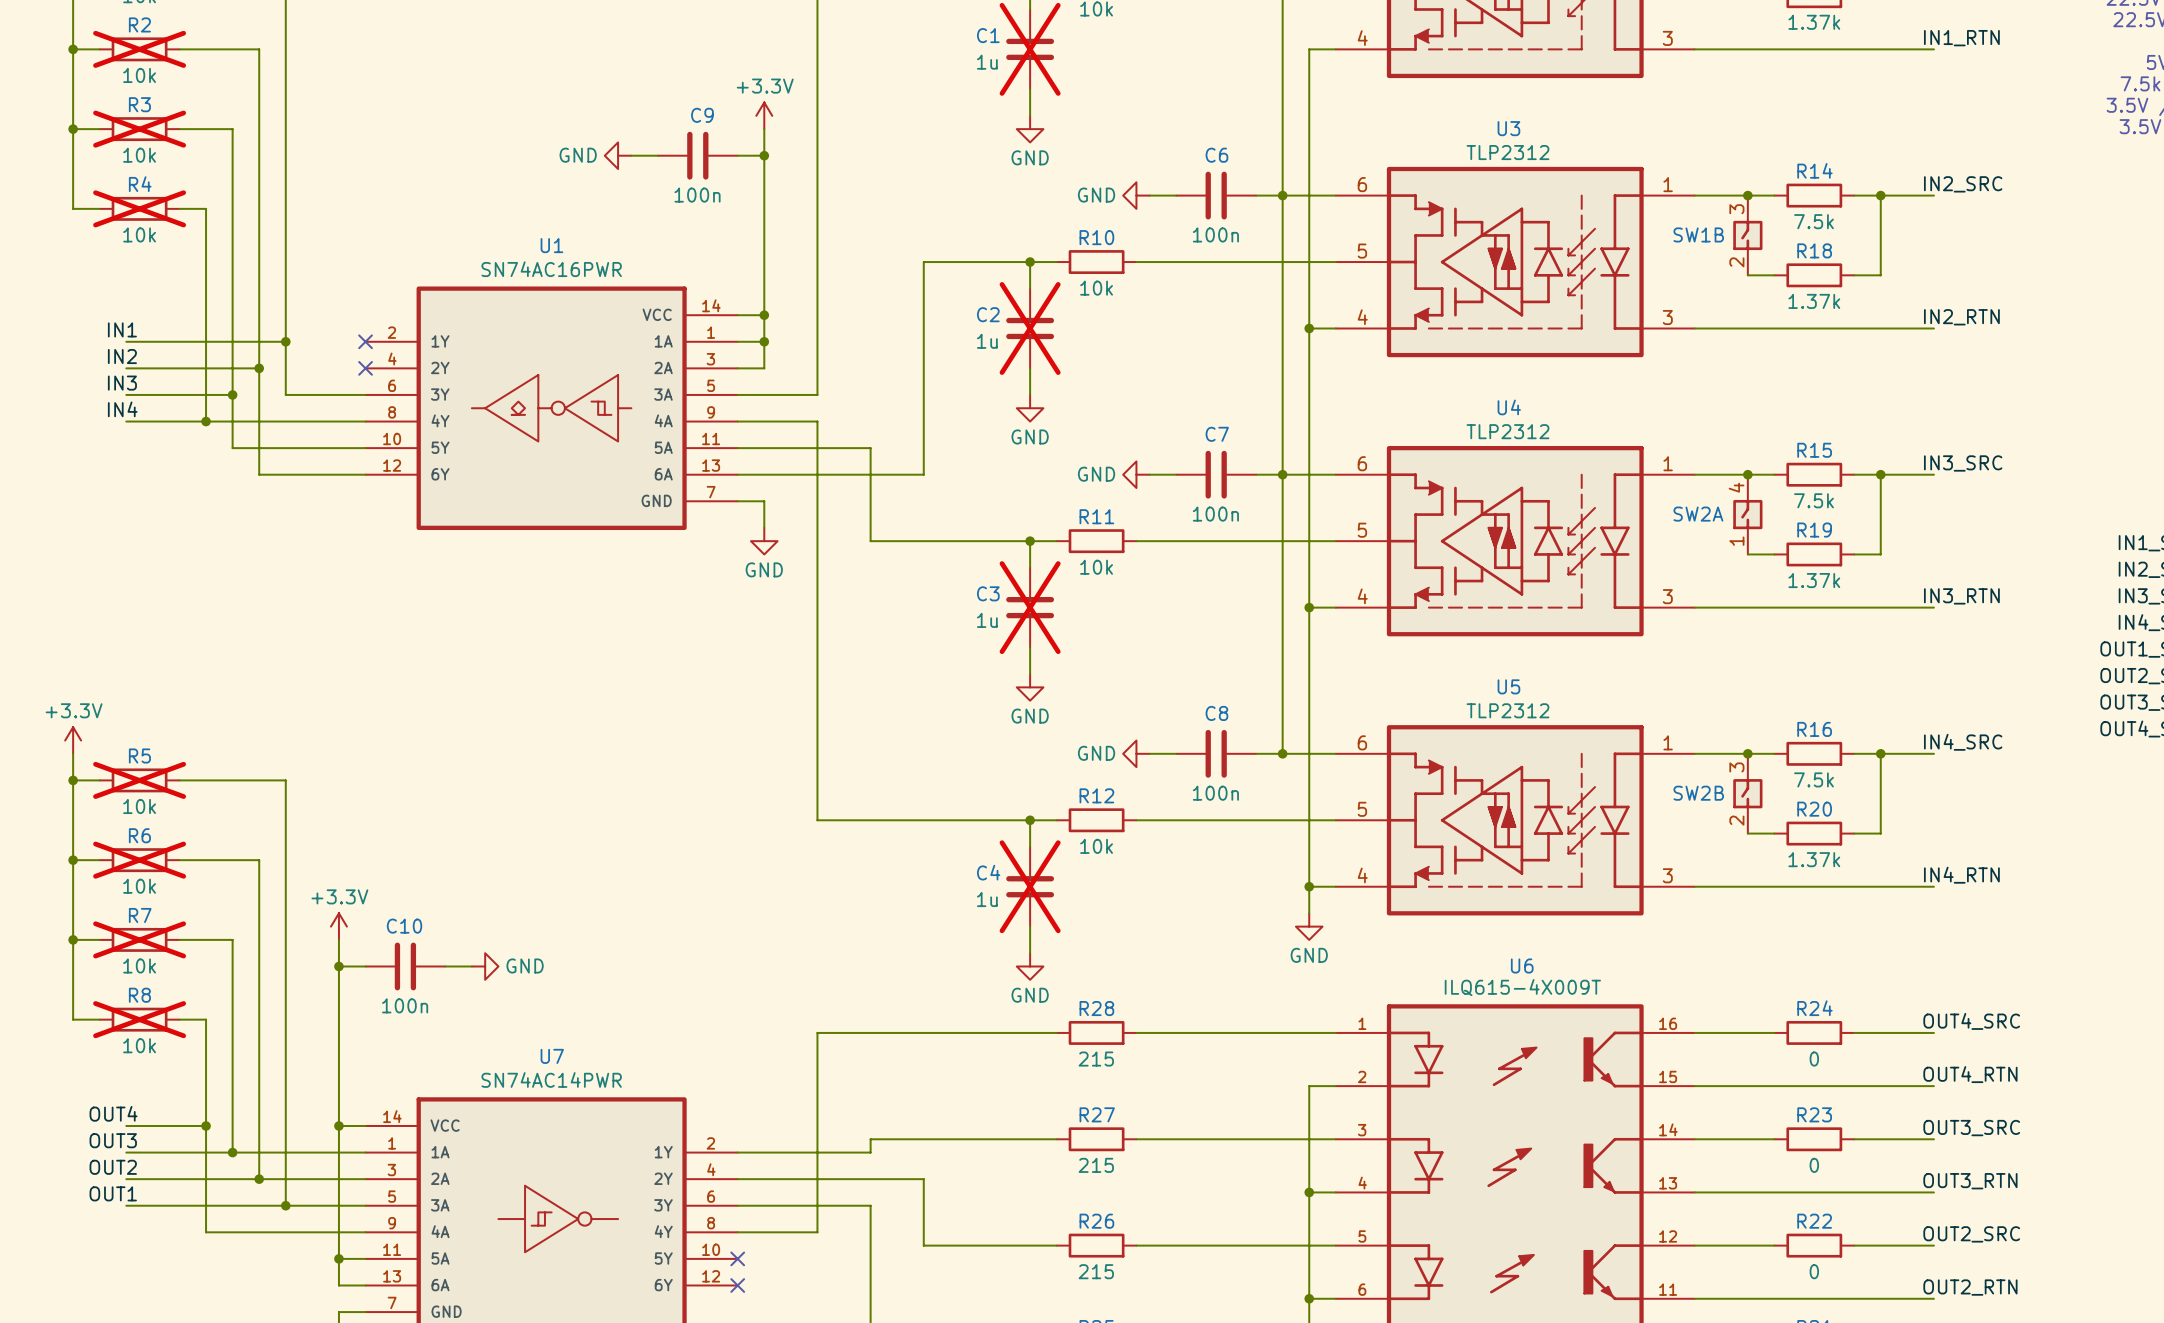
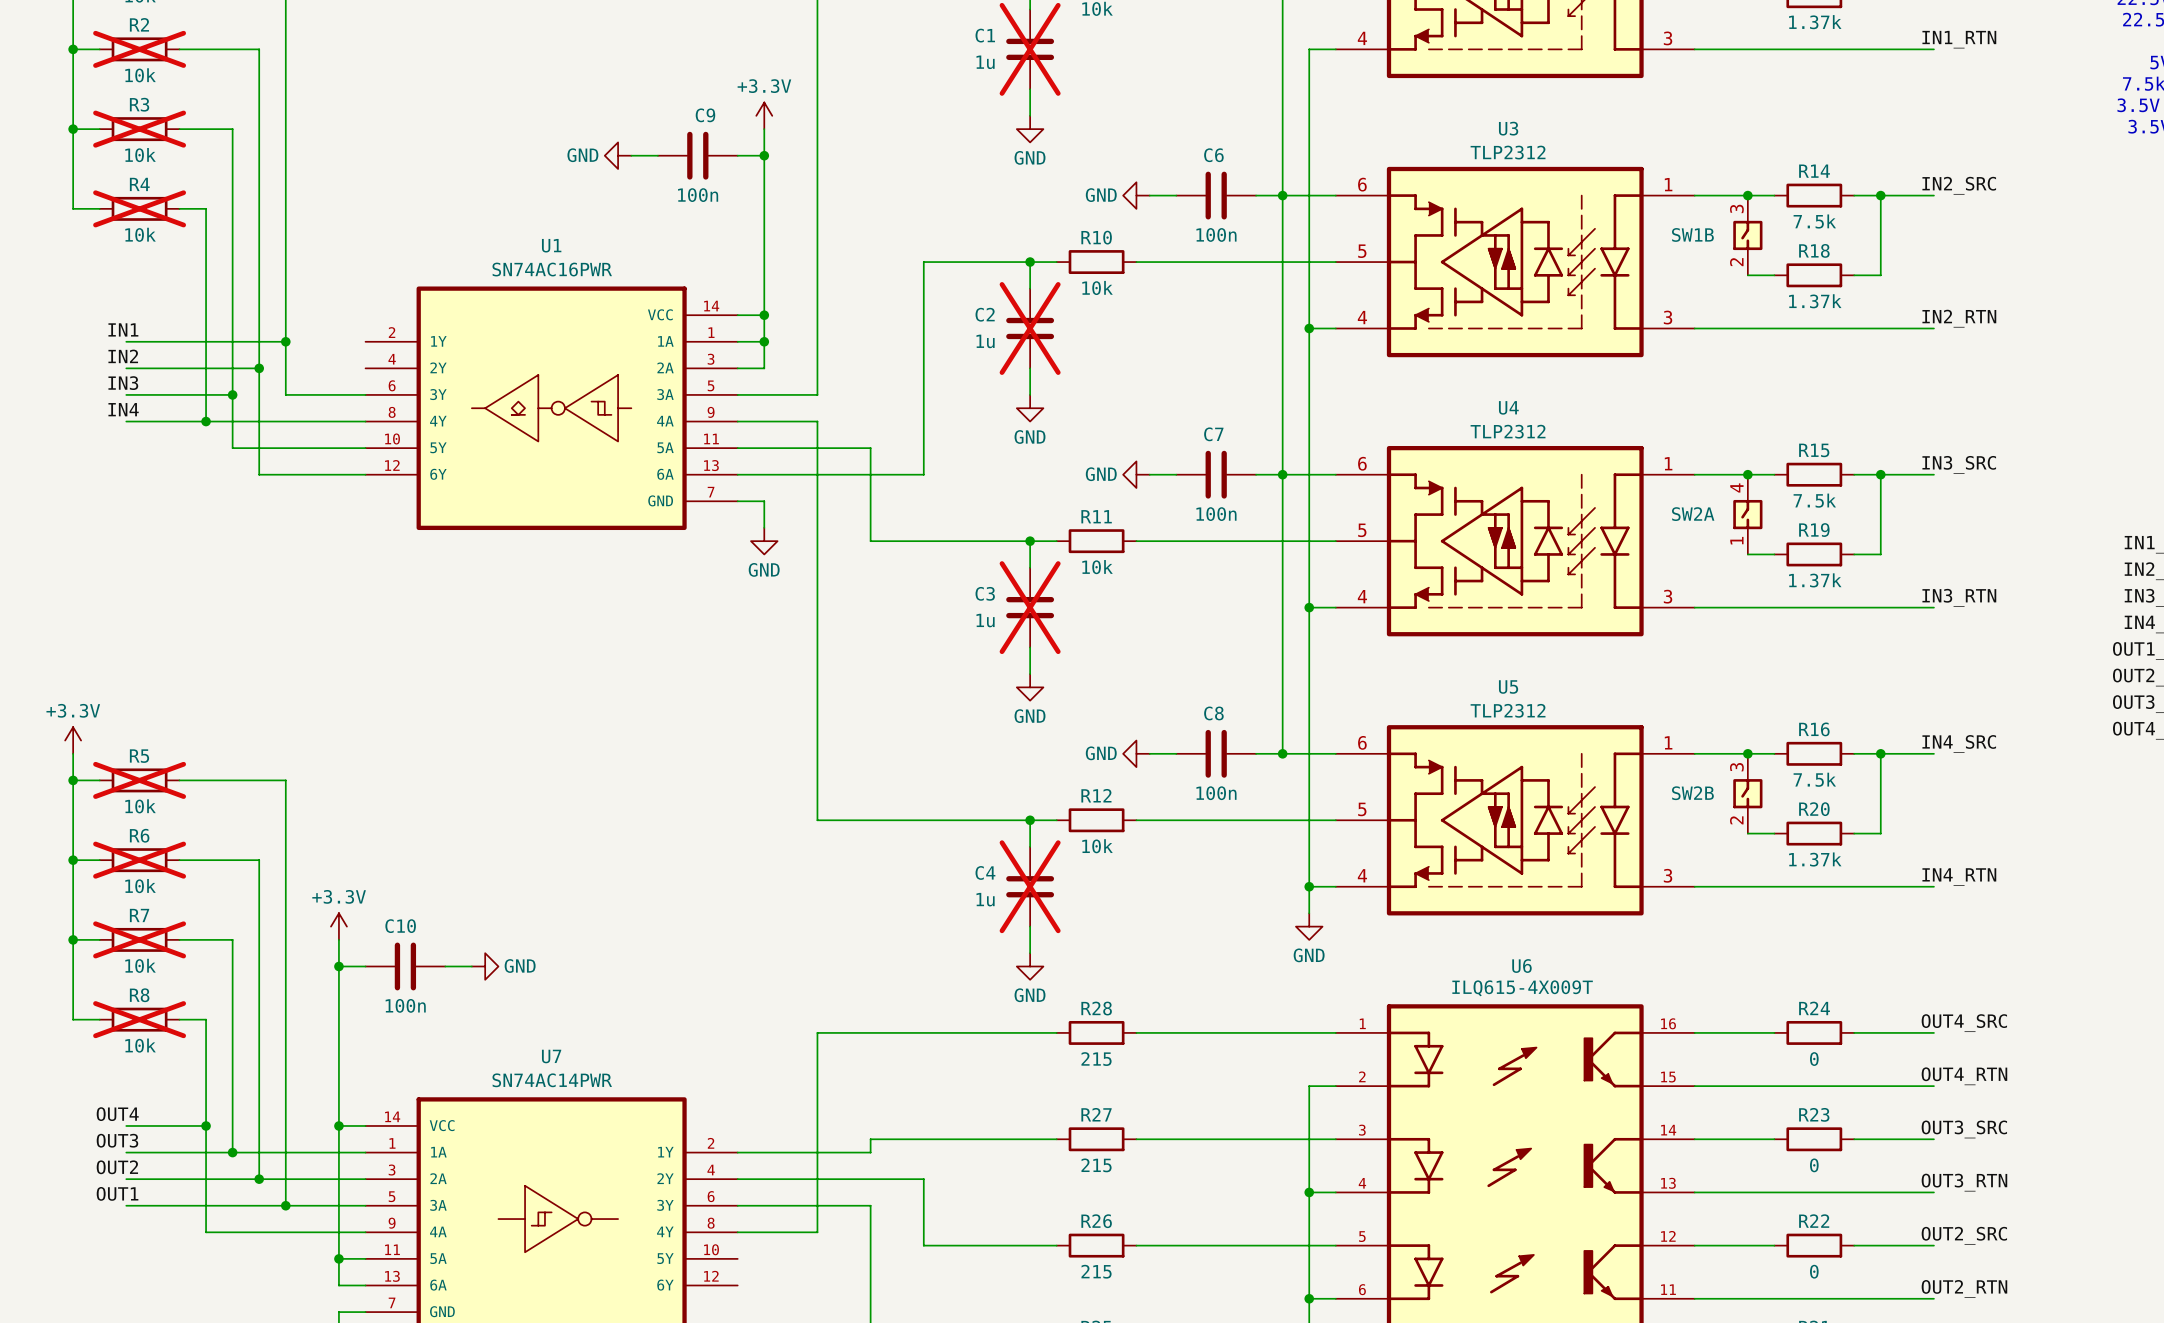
no-connect mark: (365, 341) -> none
no-connect mark: (365, 368) -> none
no-connect mark: (737, 1258) -> none
no-connect mark: (737, 1285) -> none

